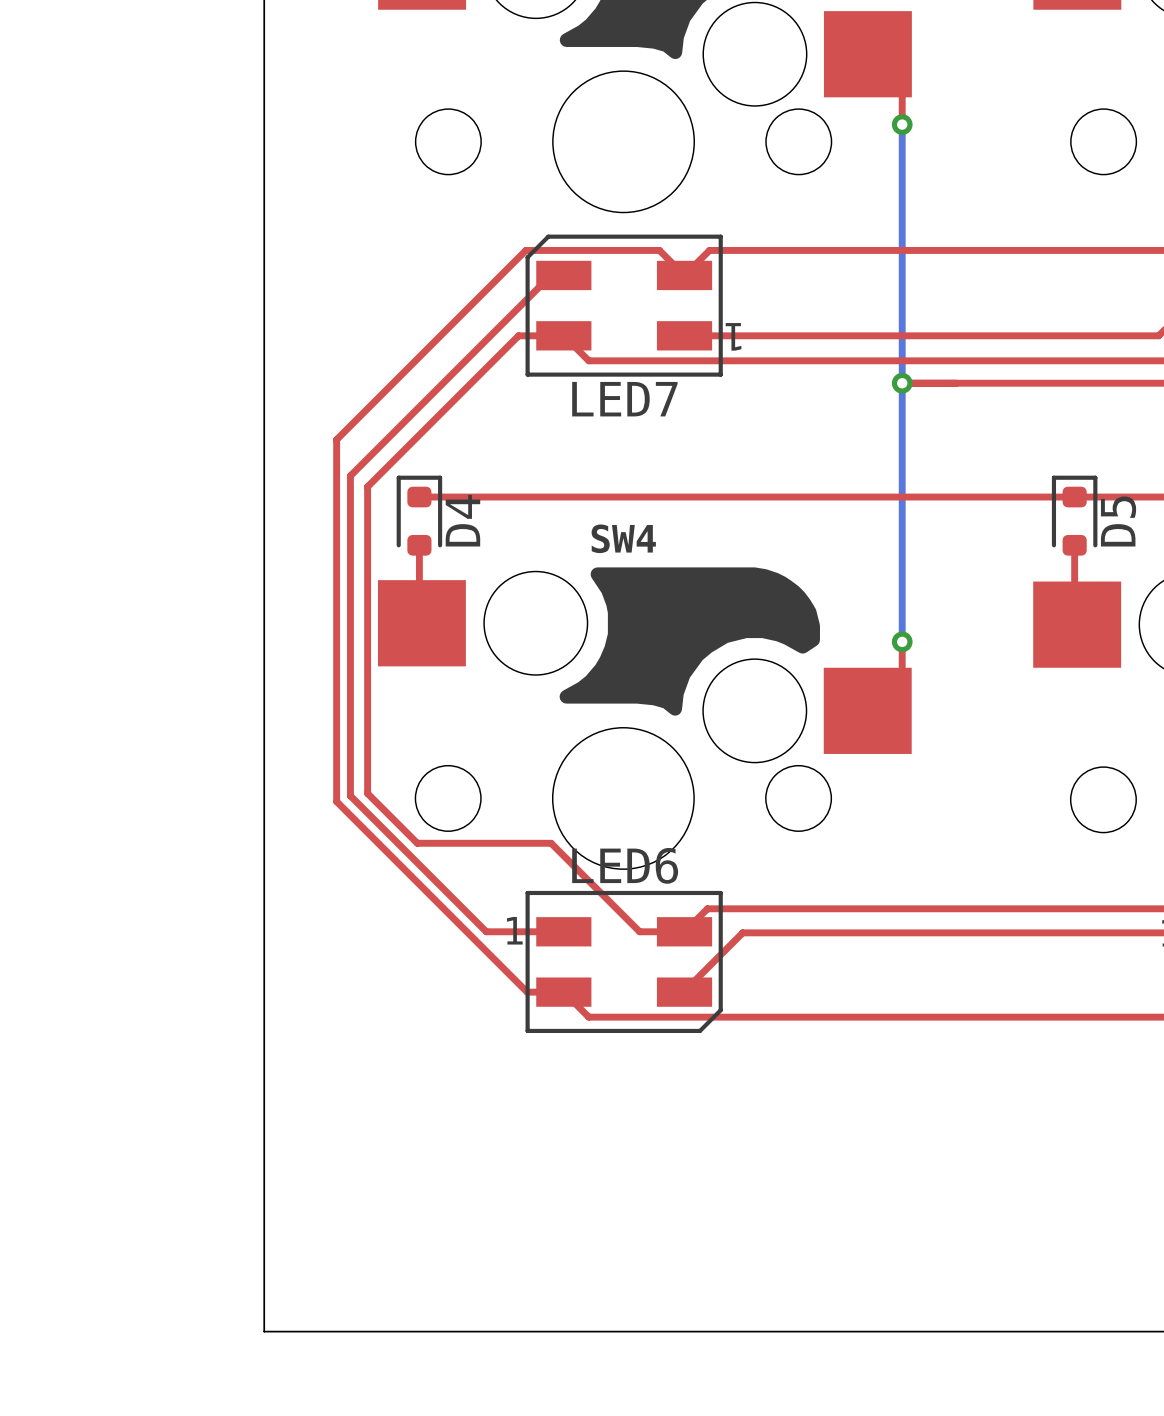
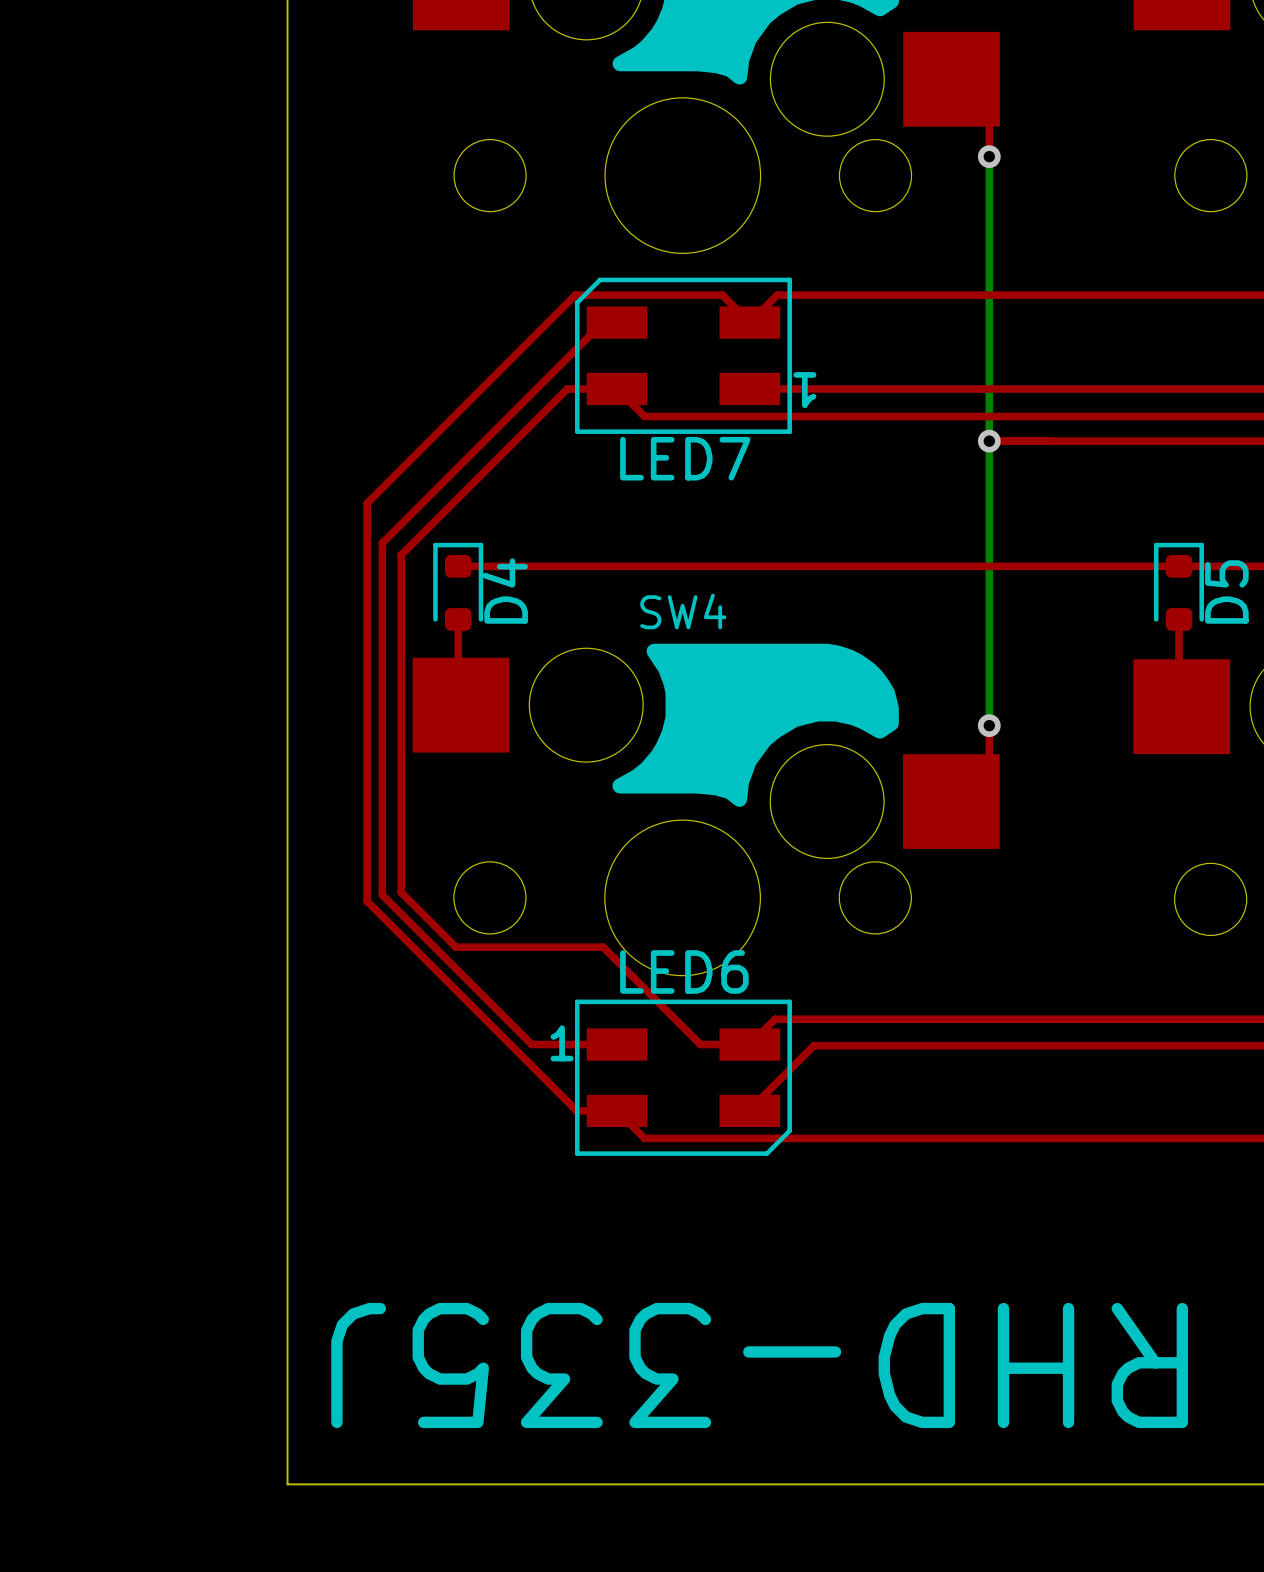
text: none -> RHD-335J (759, 1365)

